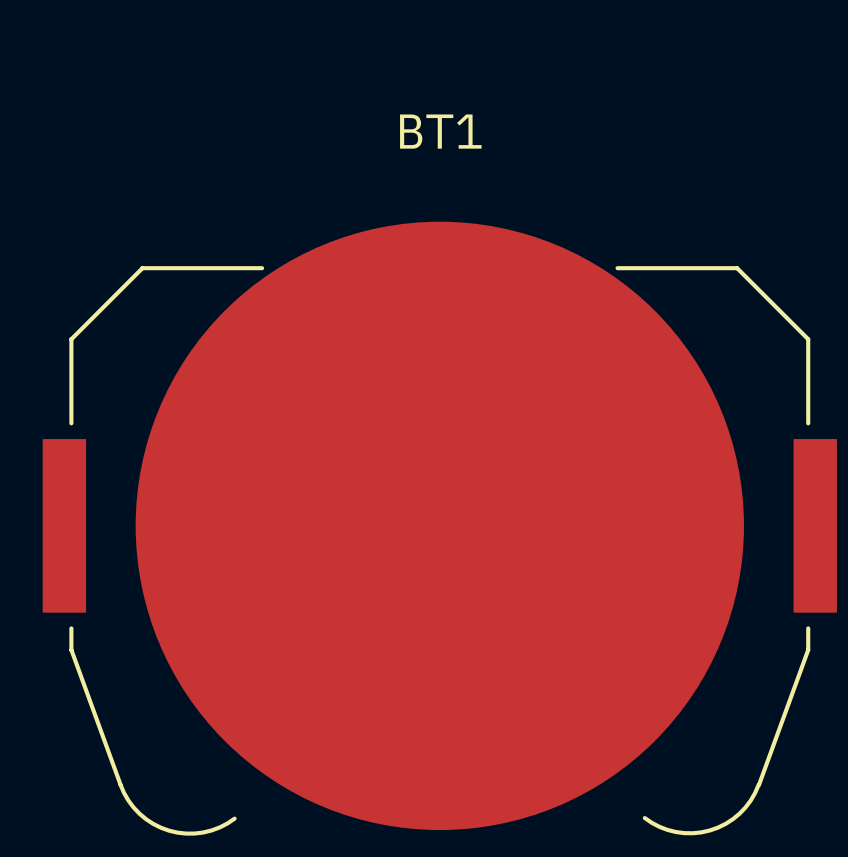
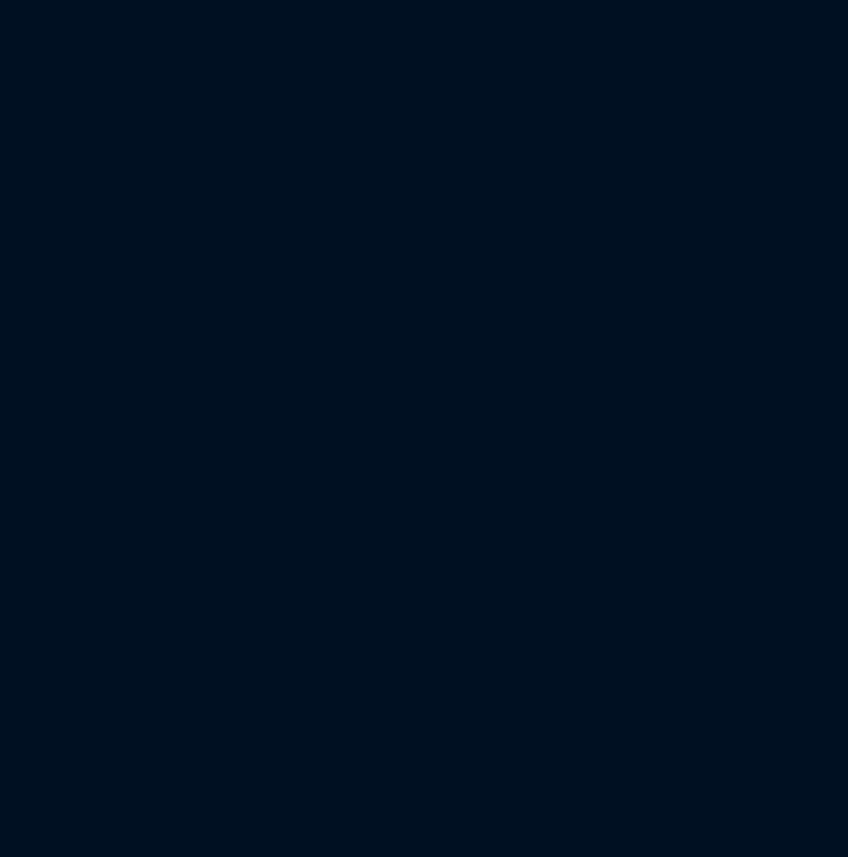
BT1: (439, 528) -> none

